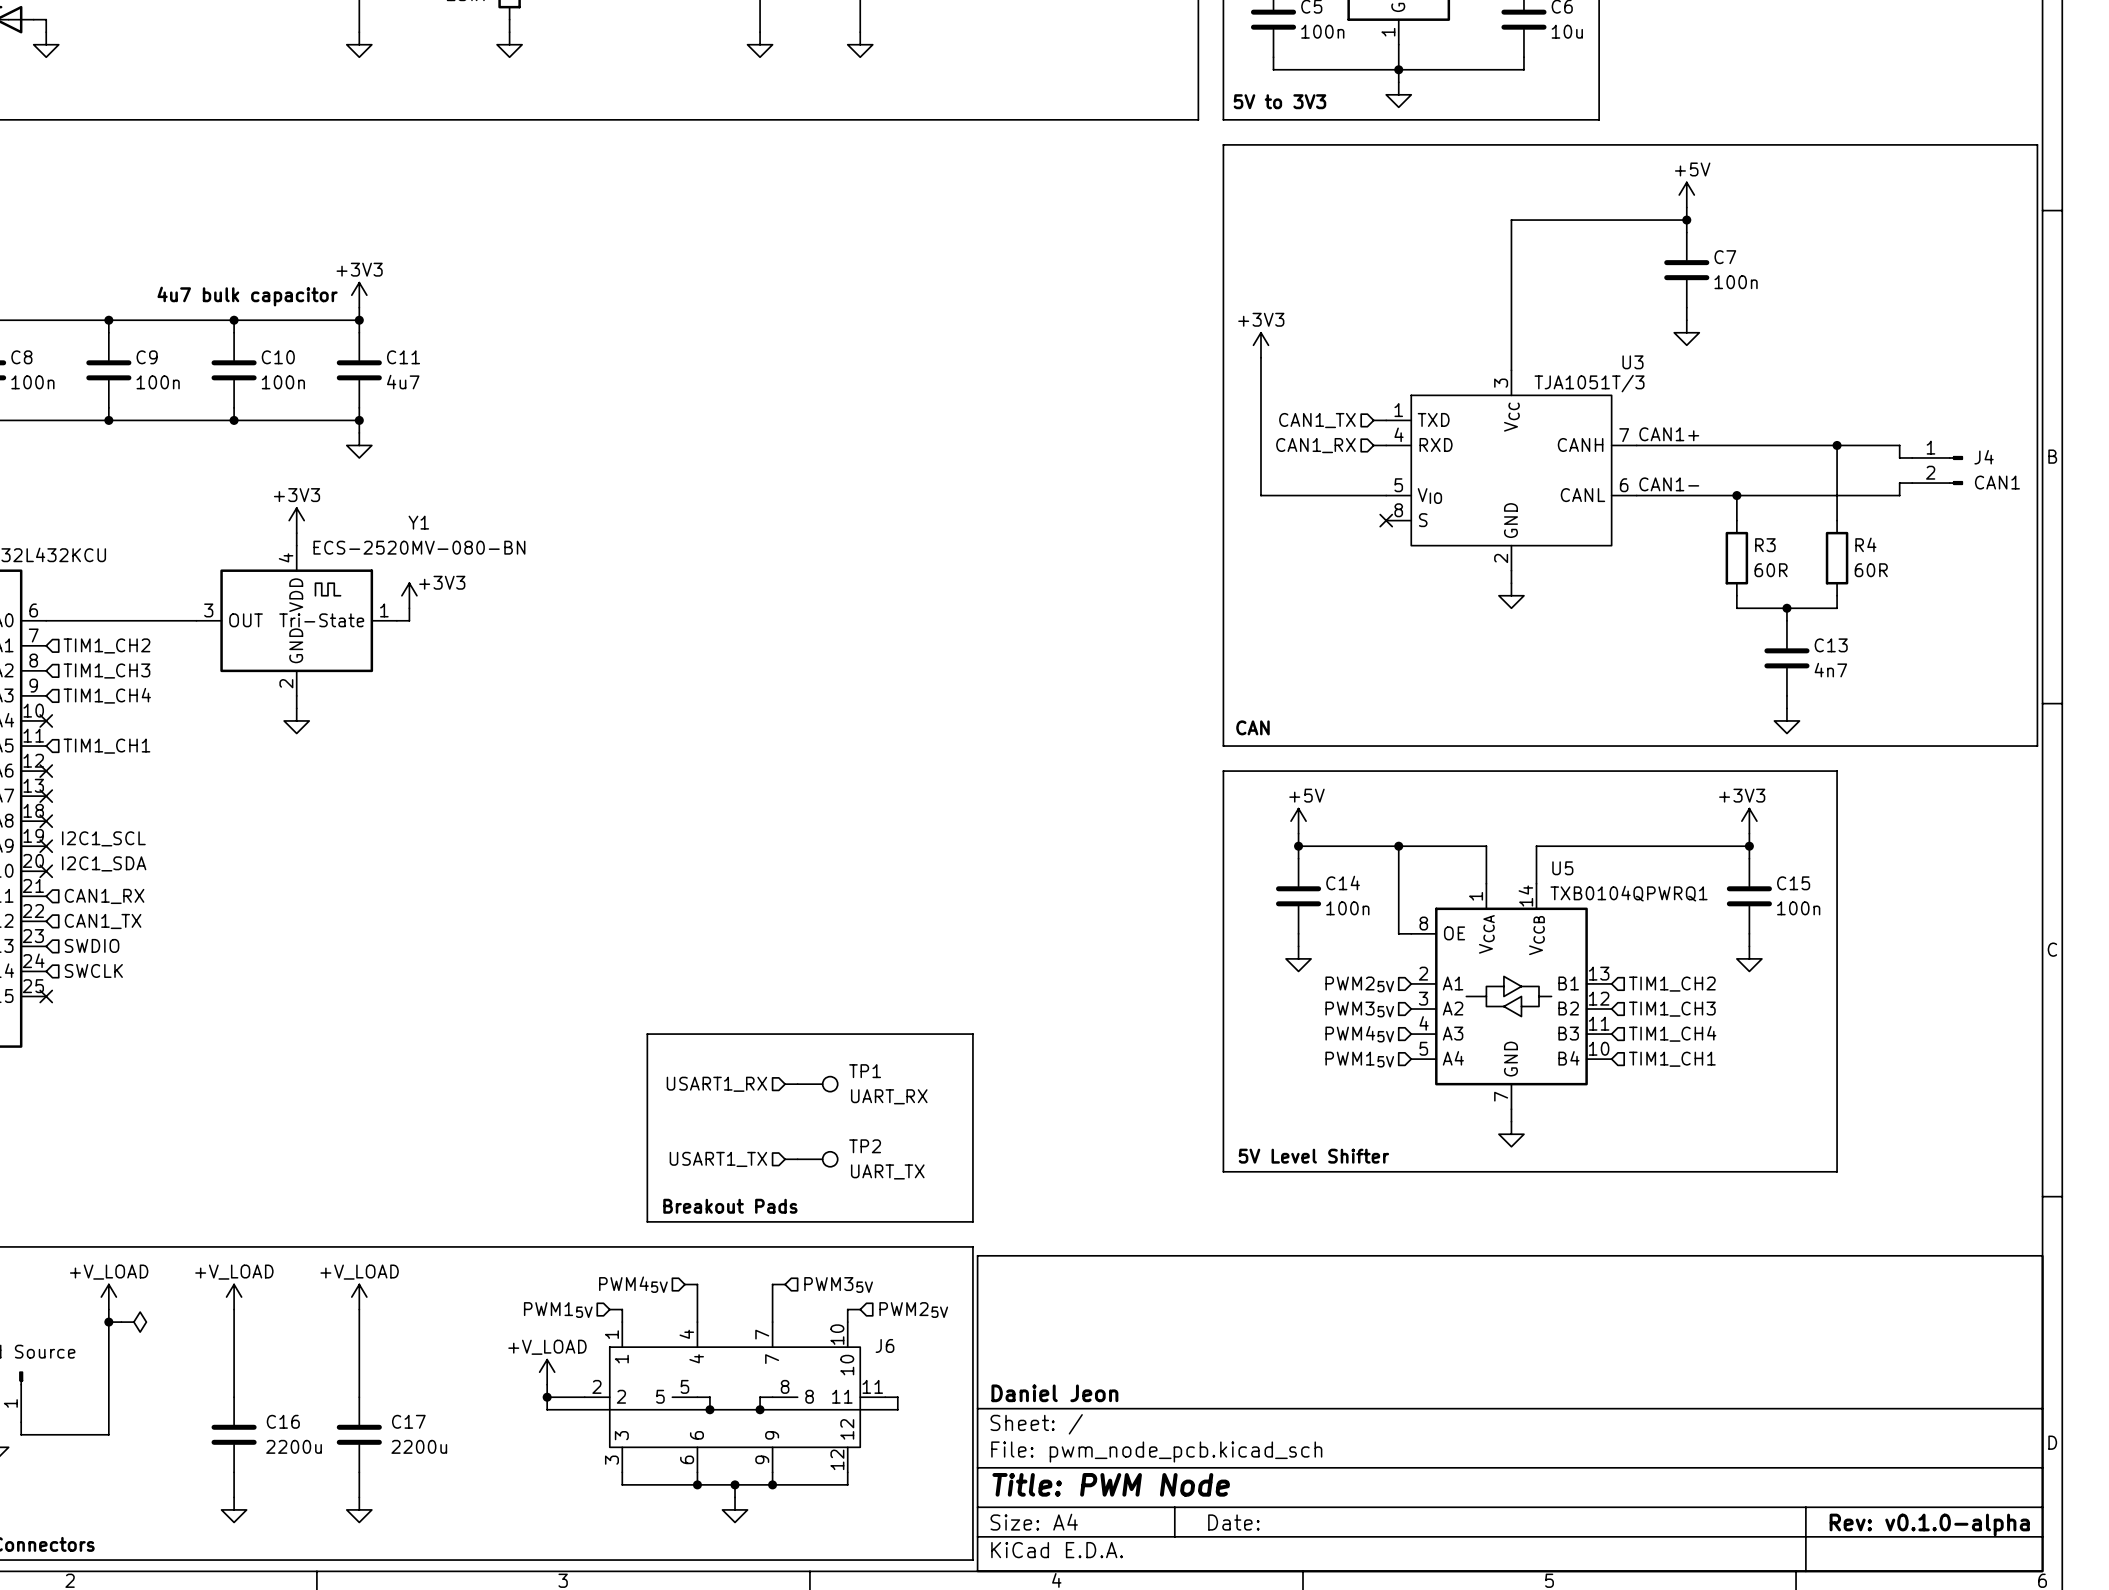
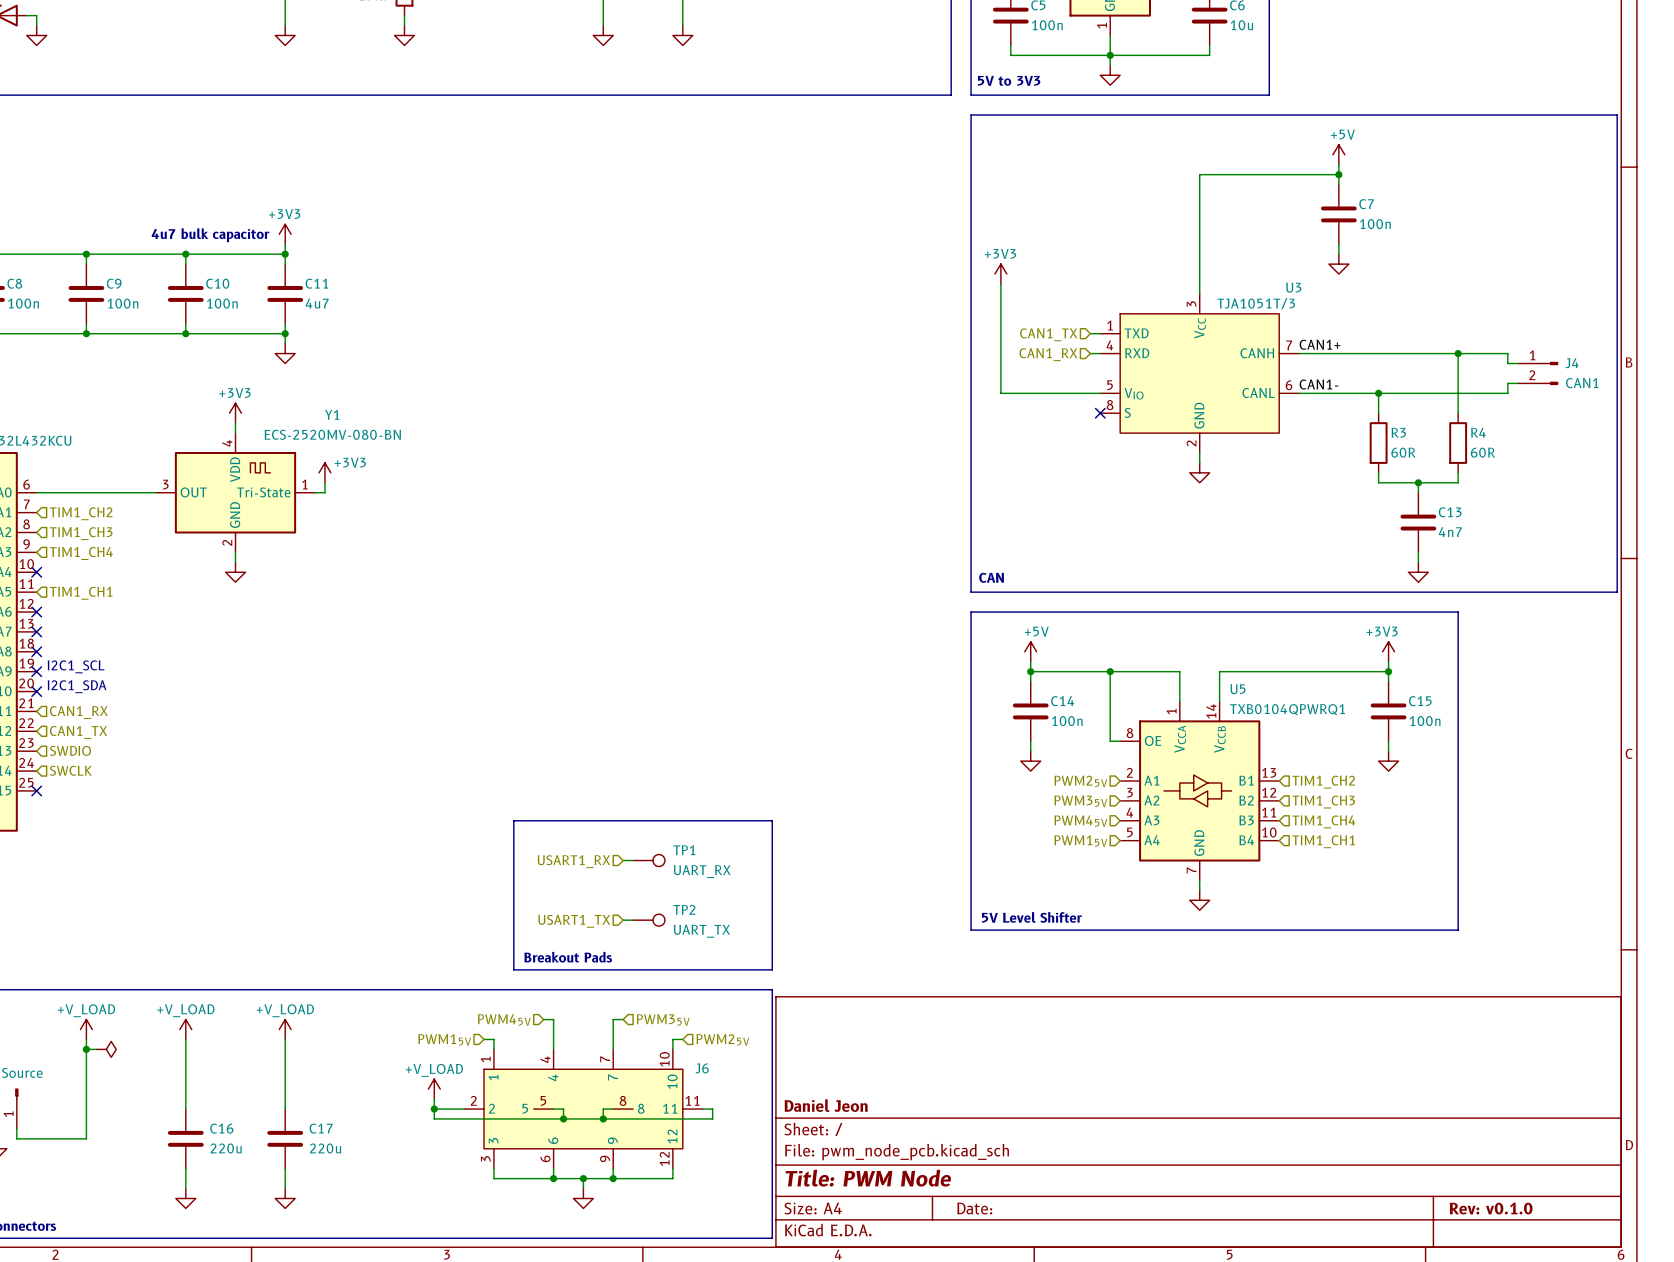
C16 value: 2200u (294, 1446) -> 220u (226, 1148)
C17 value: 2200u (419, 1446) -> 220u (325, 1148)
title block: Rev: v0.1.0-alpha (1929, 1524) -> Rev: v0.1.0 (1491, 1208)

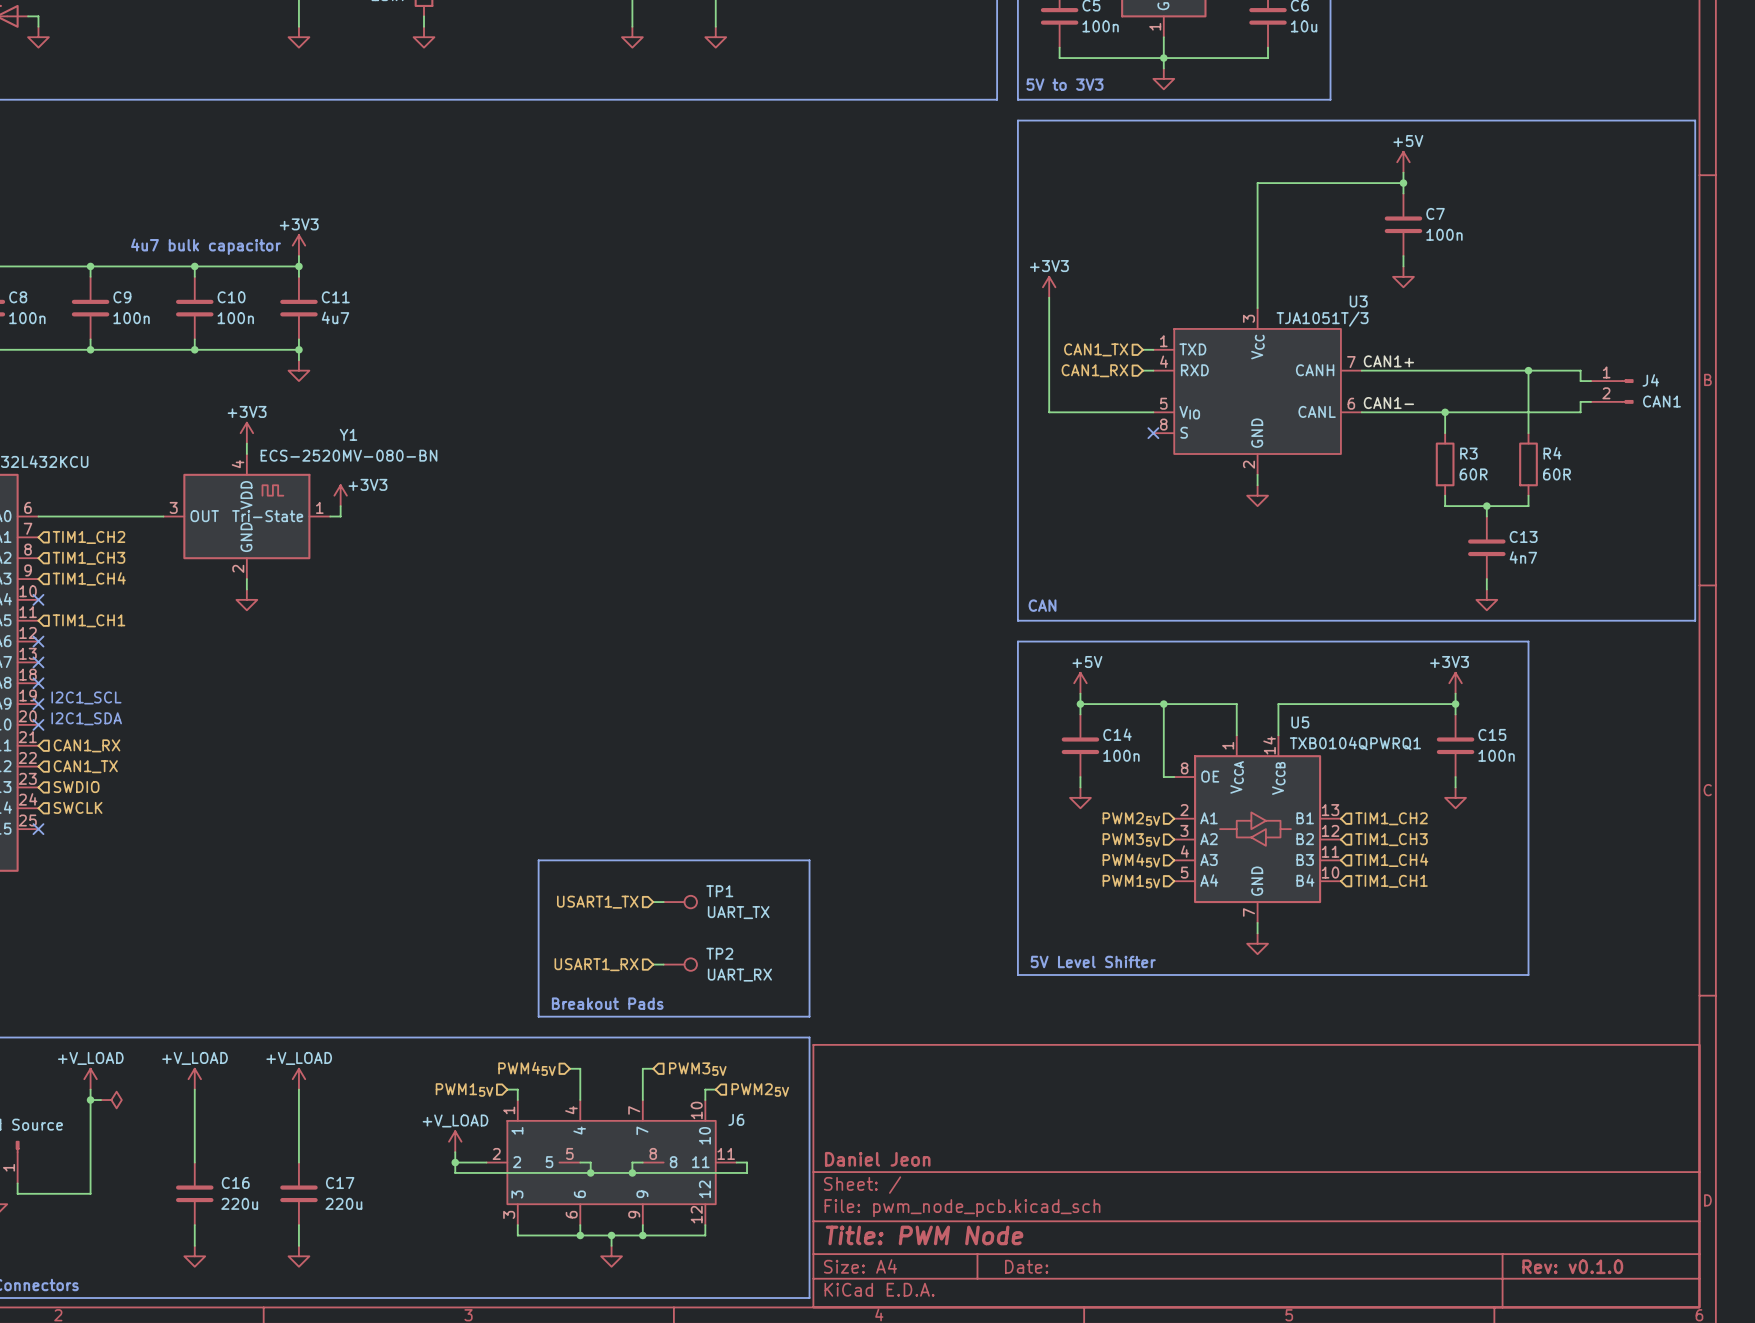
hierarchical label: USART1_RX (573, 861) -> USART1_TX (597, 902)
TP1 value: UART_RX (702, 871) -> UART_TX (738, 912)
hierarchical label: USART1_TX (574, 921) -> USART1_RX (596, 964)
TP2 value: UART_TX (701, 931) -> UART_RX (739, 975)

